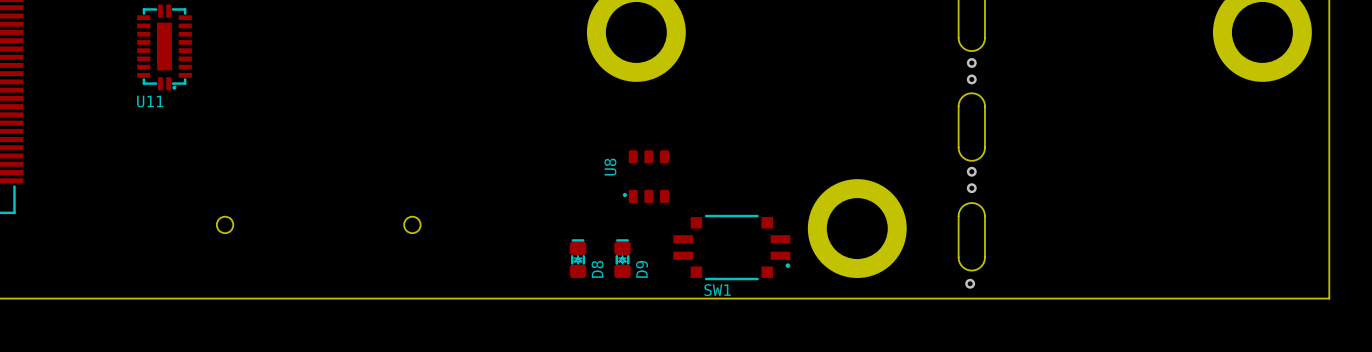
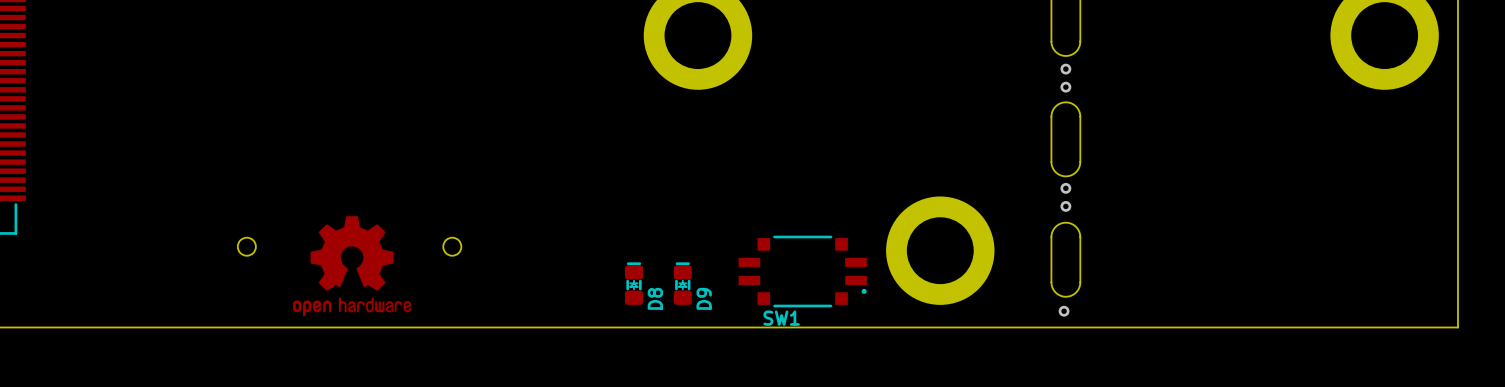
U11: (164, 47) -> none
U8: (645, 176) -> none
drawing: none -> [293, 216, 412, 317]

